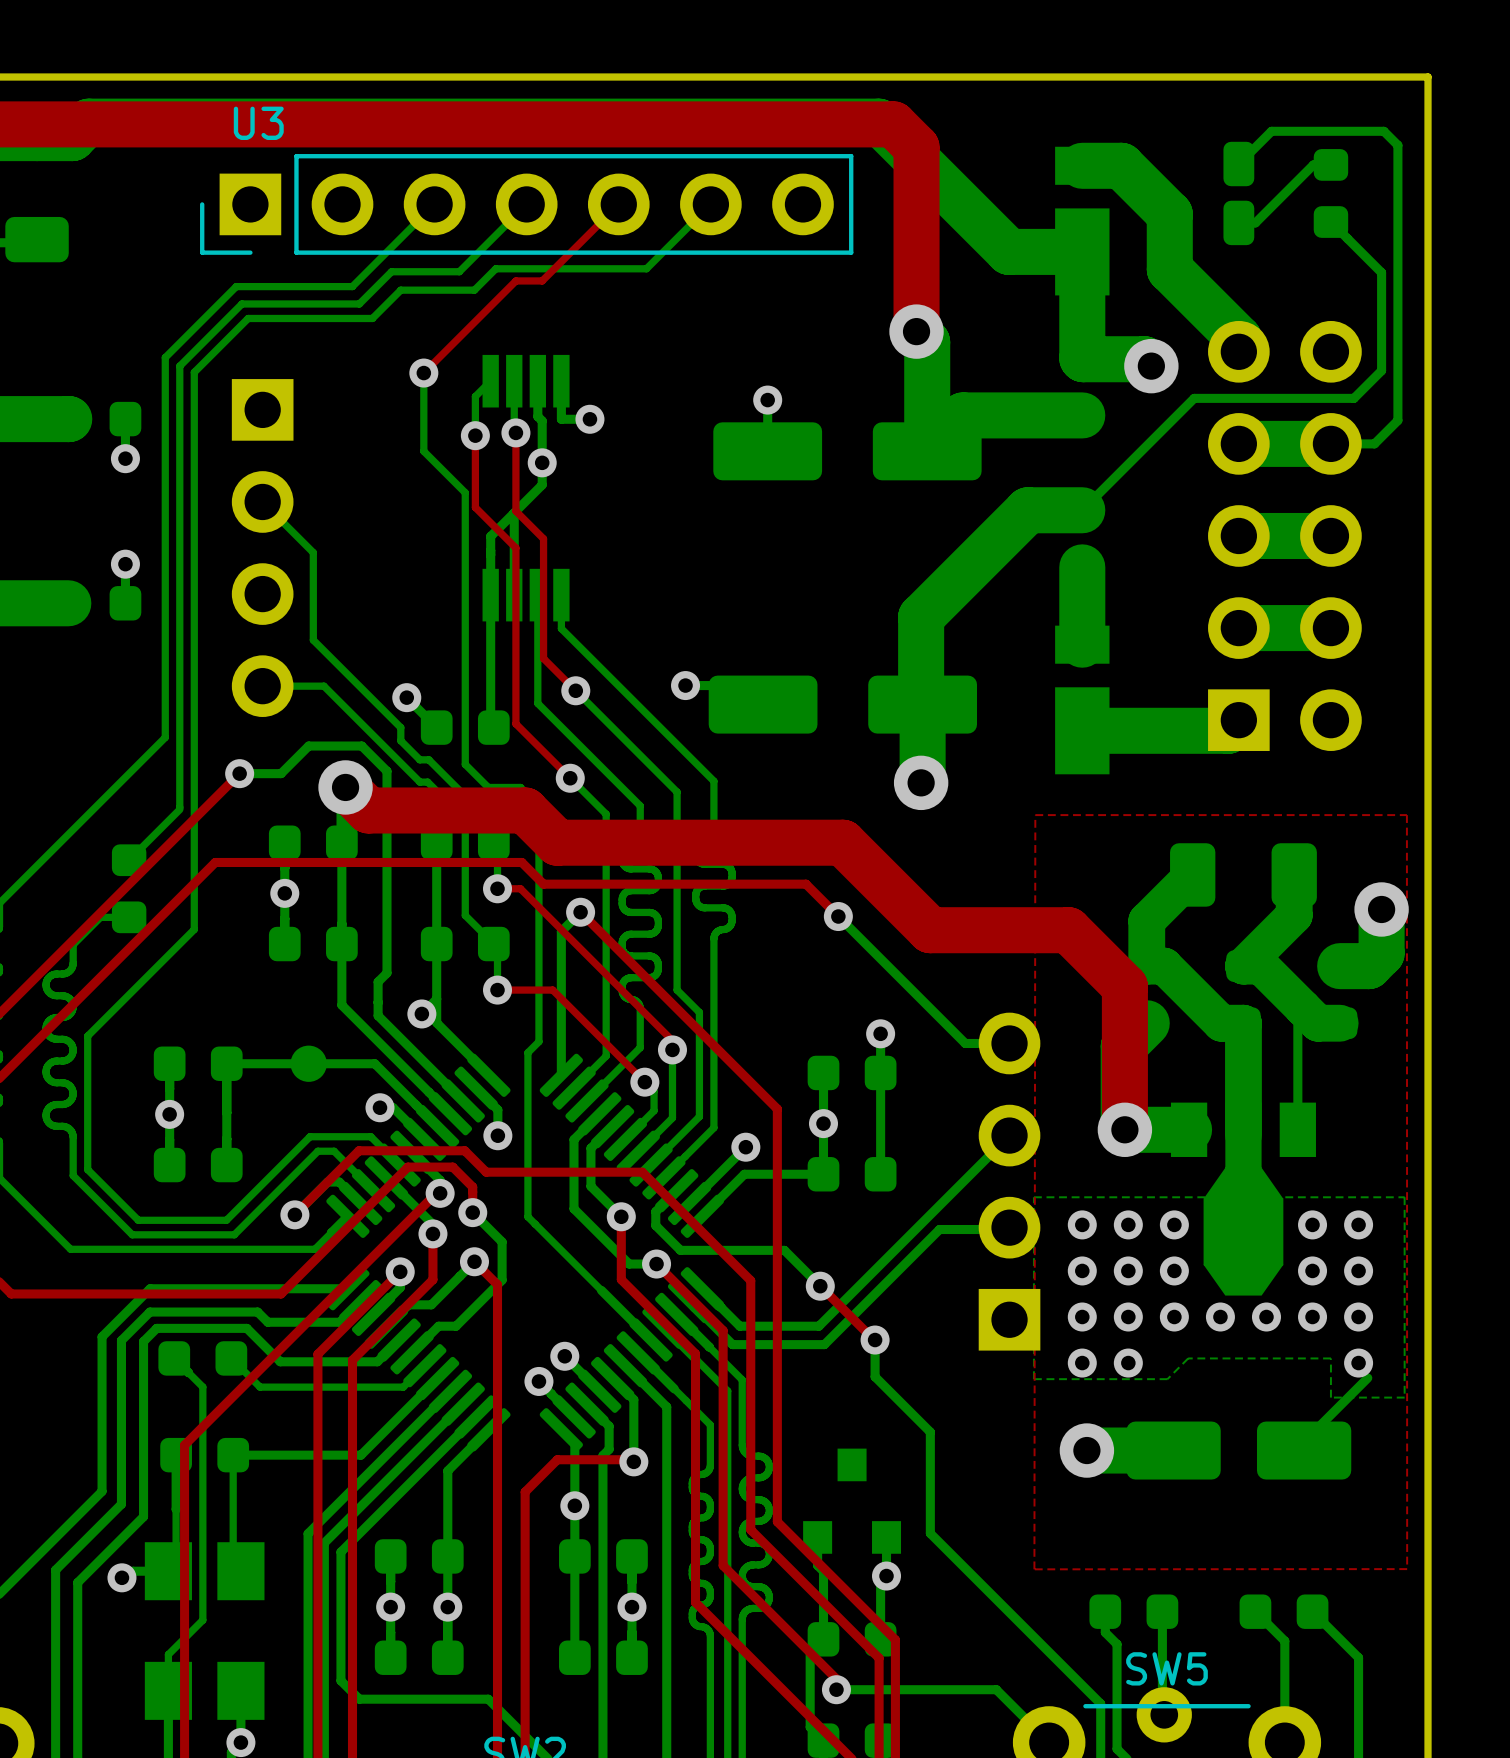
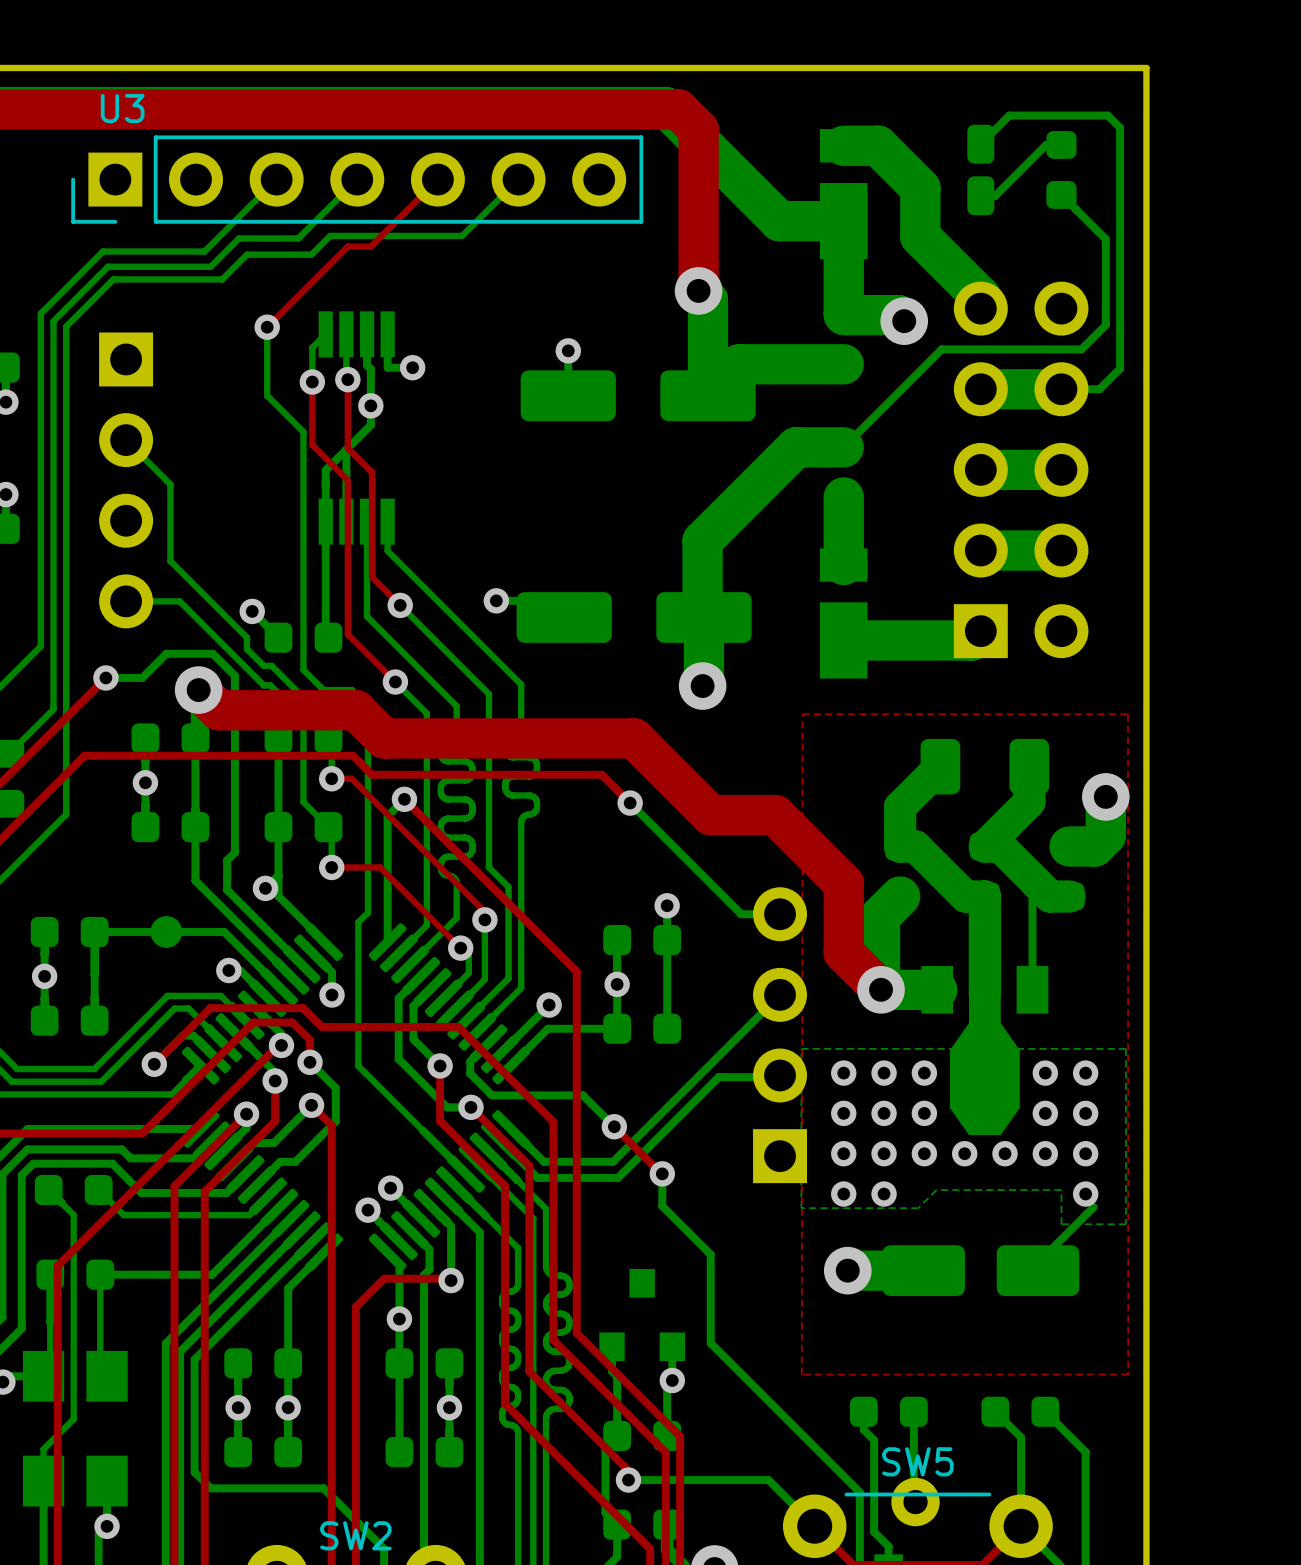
top track: (1004, 930) (1068, 930) (1124, 986) (1124, 1129) -> (775, 815) (843, 883) (843, 952) (881, 989)

